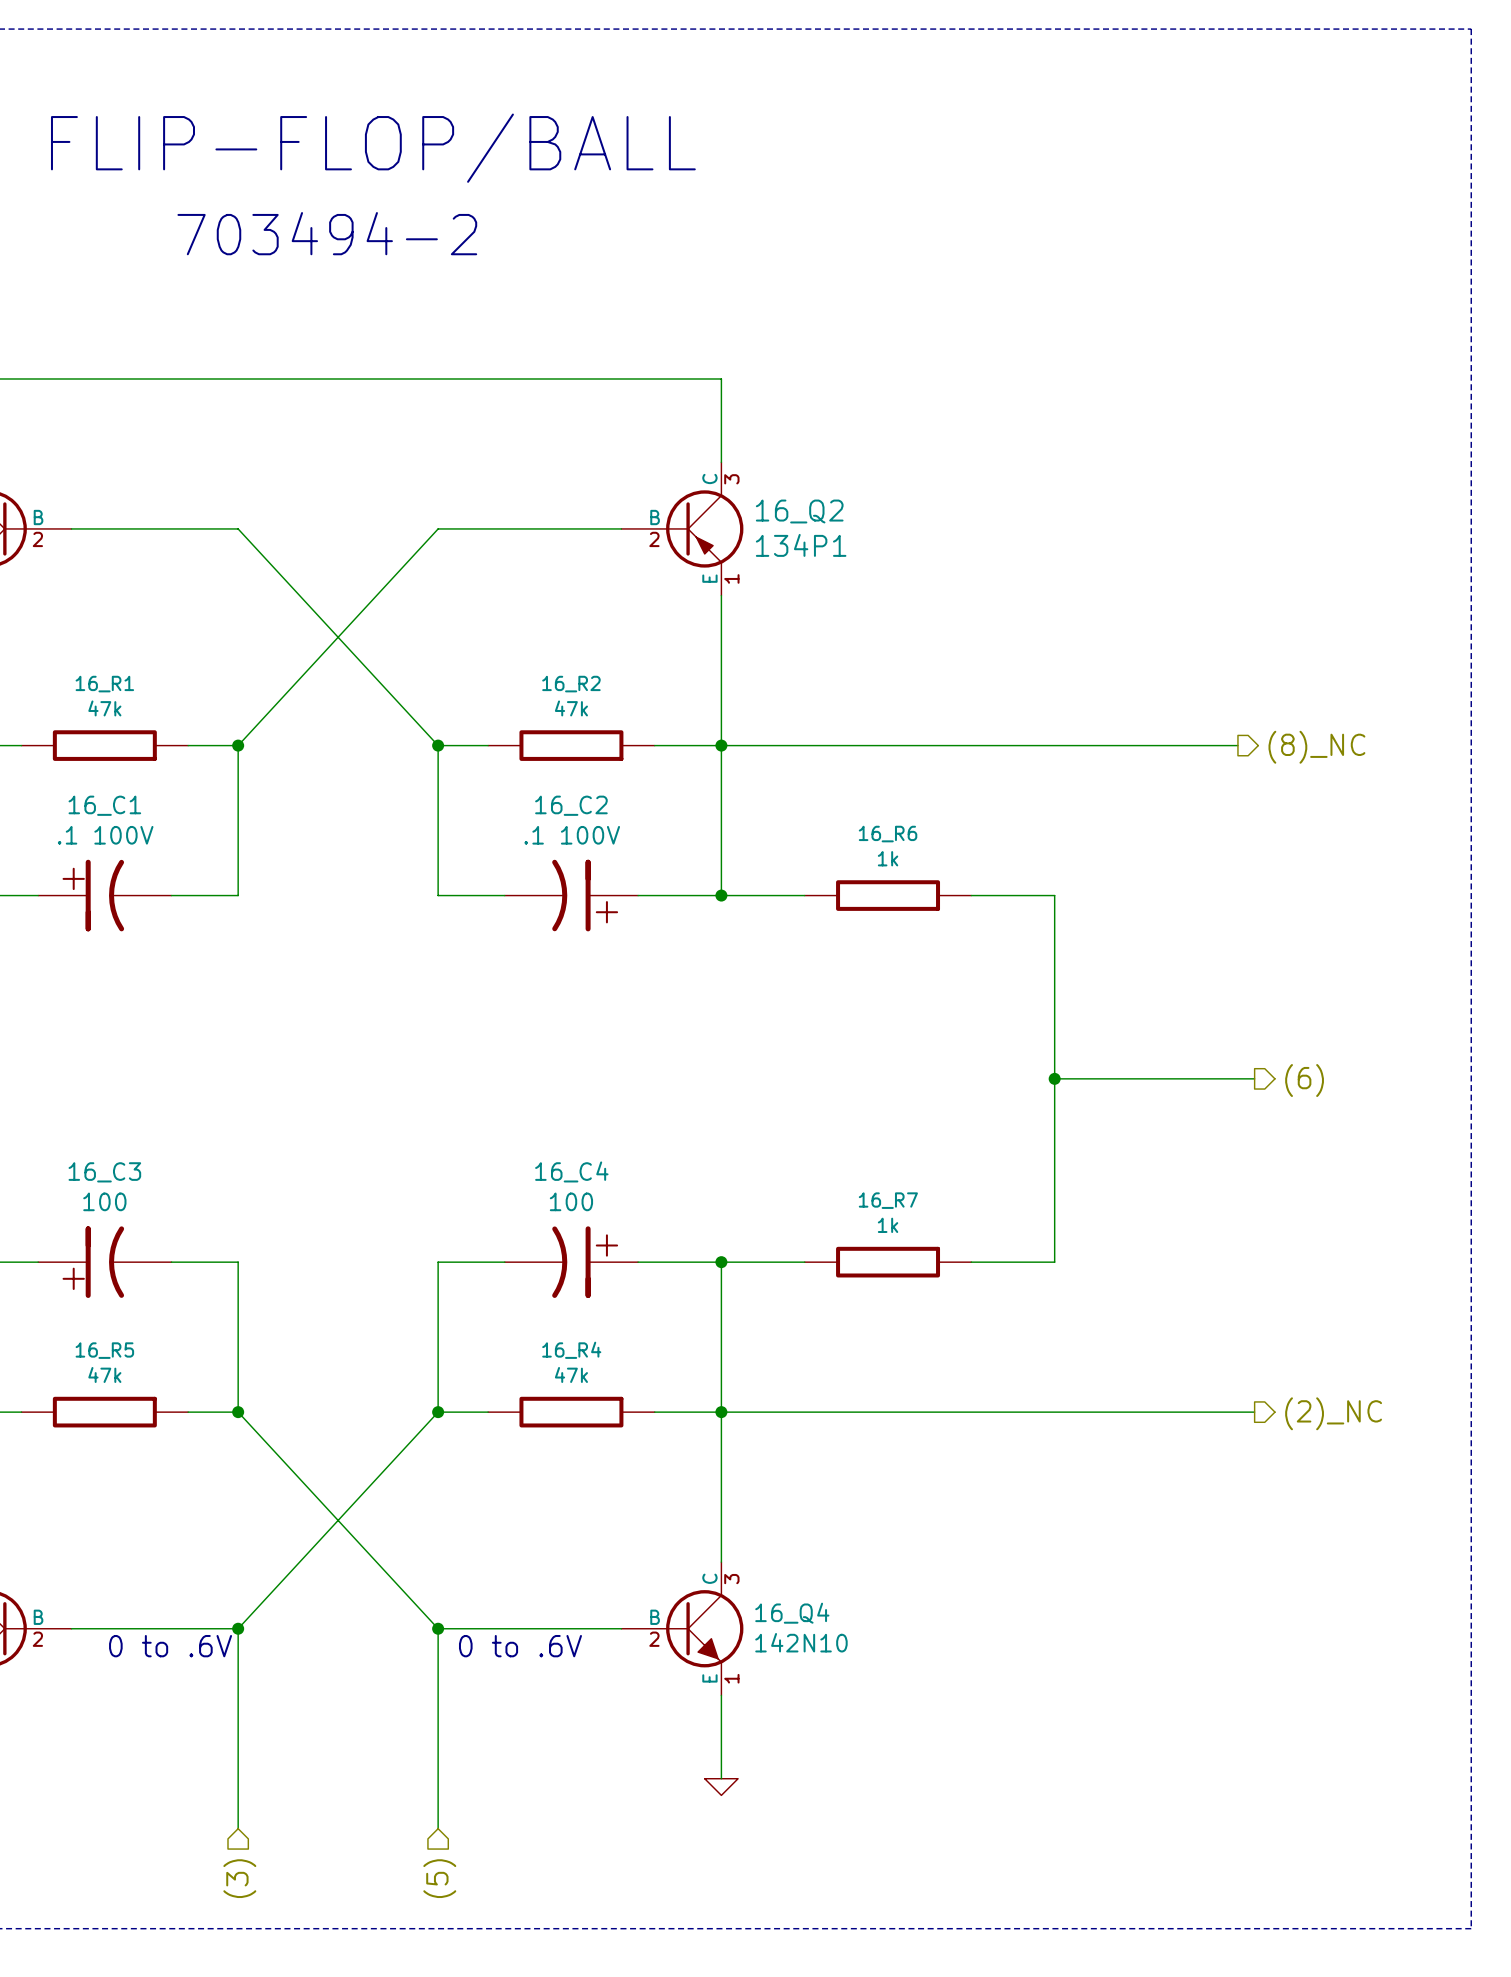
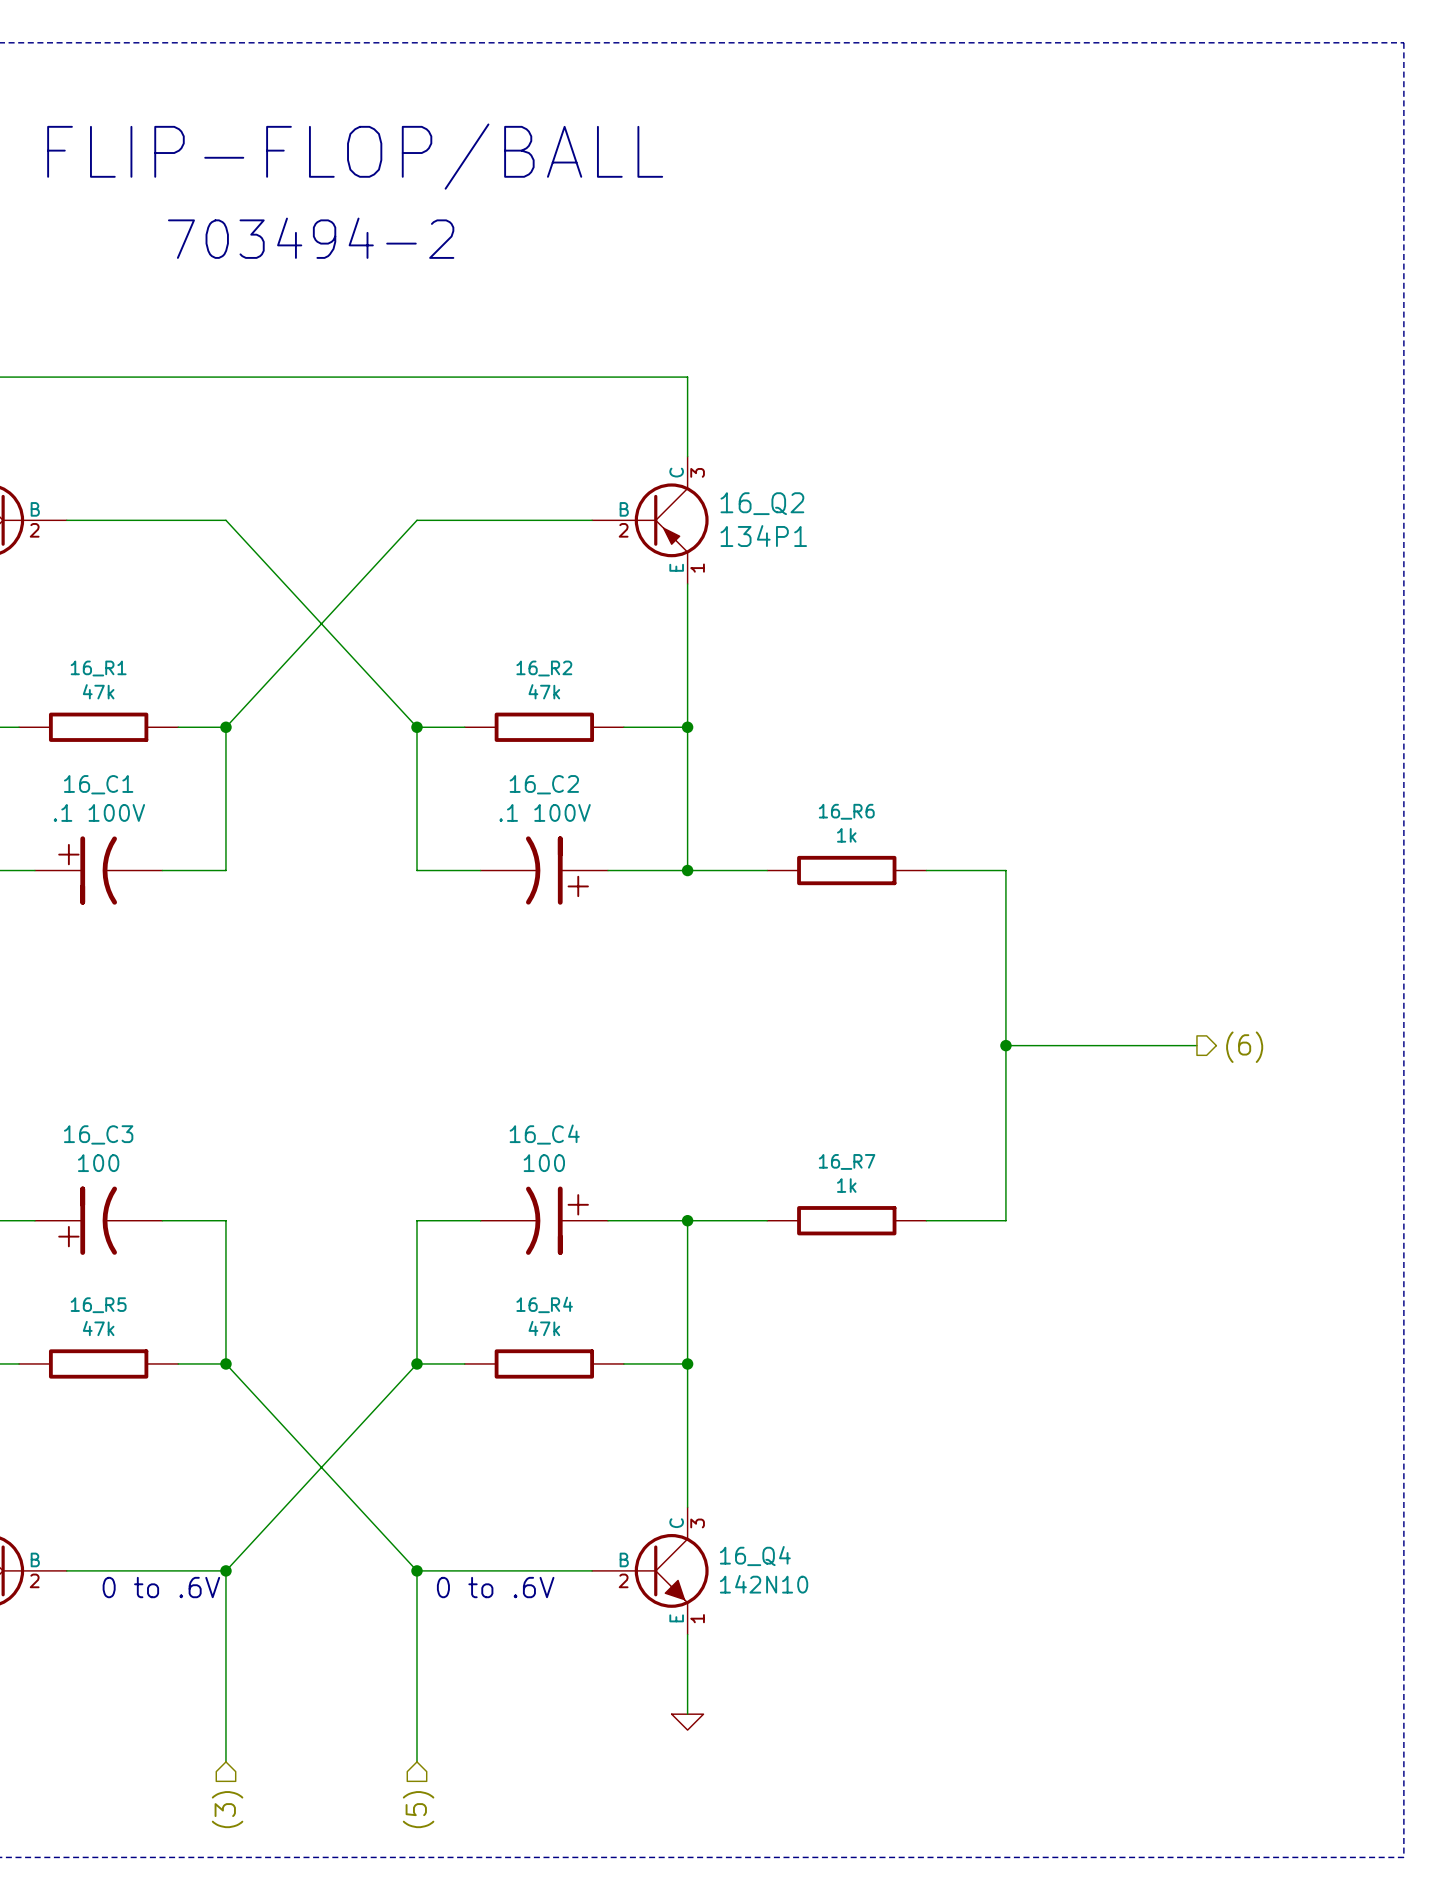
wire: (721, 745) (1237, 745) -> none
hierarchical label: (8)_NC (1316, 747) -> none
wire: (721, 1412) (1254, 1412) -> none
hierarchical label: (2)_NC (1333, 1413) -> none

